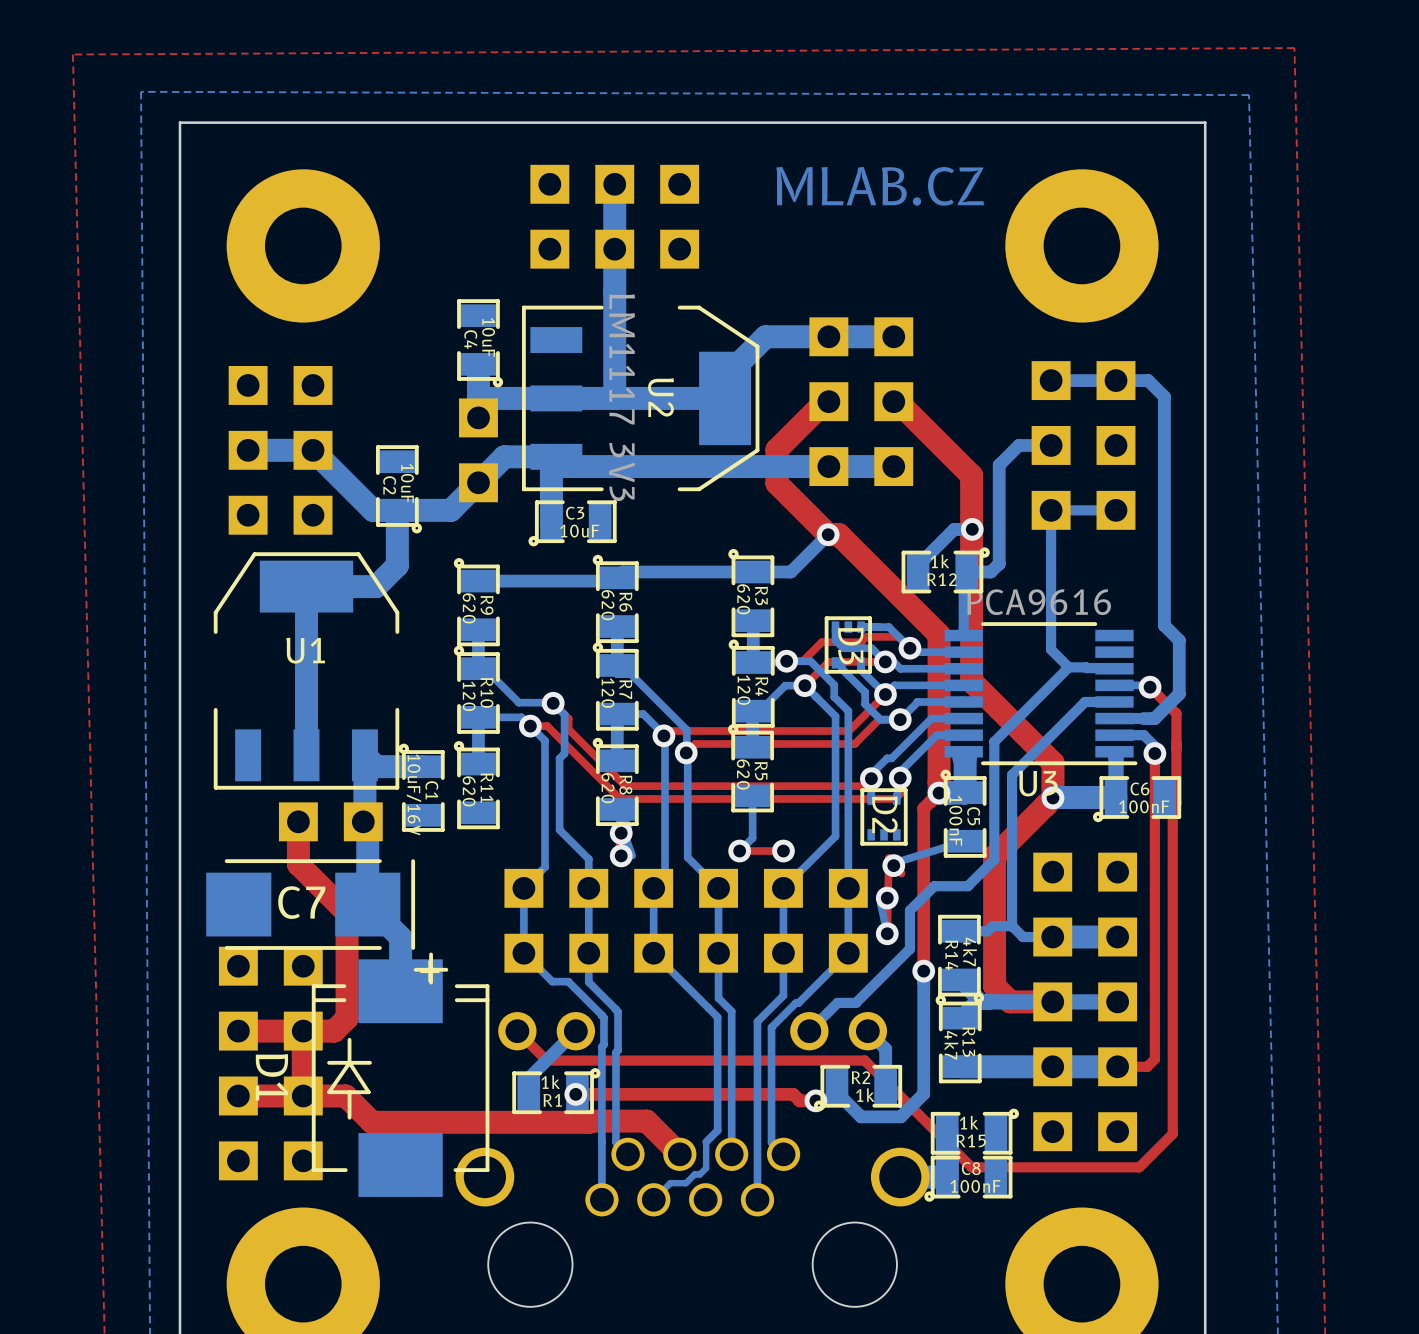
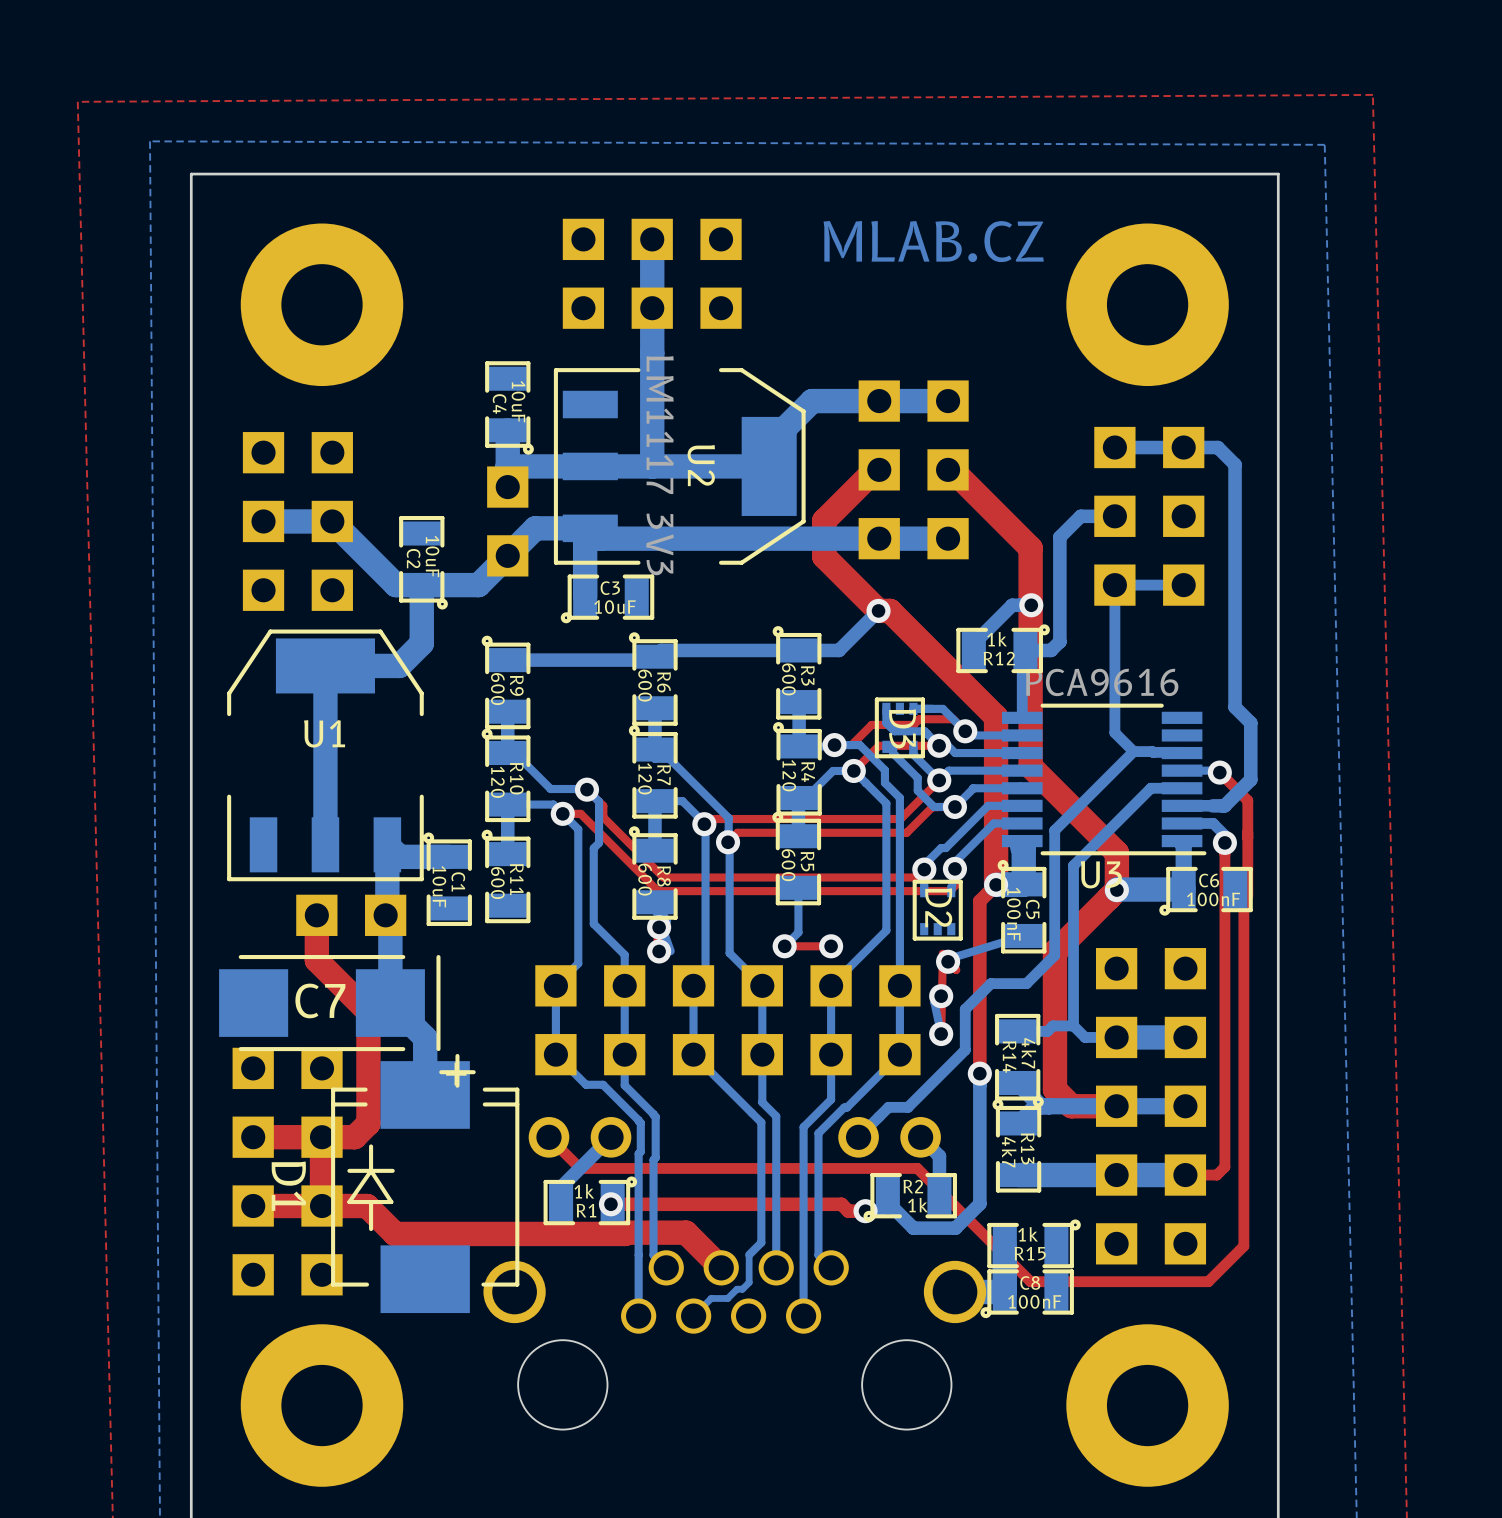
R3 value: 620 (743, 599) -> 600 (788, 679)
R6 value: 620 (607, 605) -> 600 (645, 685)
R9 value: 620 (469, 608) -> 600 (497, 689)
R5 value: 620 (743, 774) -> 600 (788, 865)
R8 value: 620 (607, 788) -> 600 (645, 879)
R11 value: 620 (469, 791) -> 600 (497, 883)
C1 value: 10uF/16V (413, 794) -> 10uF (439, 886)

